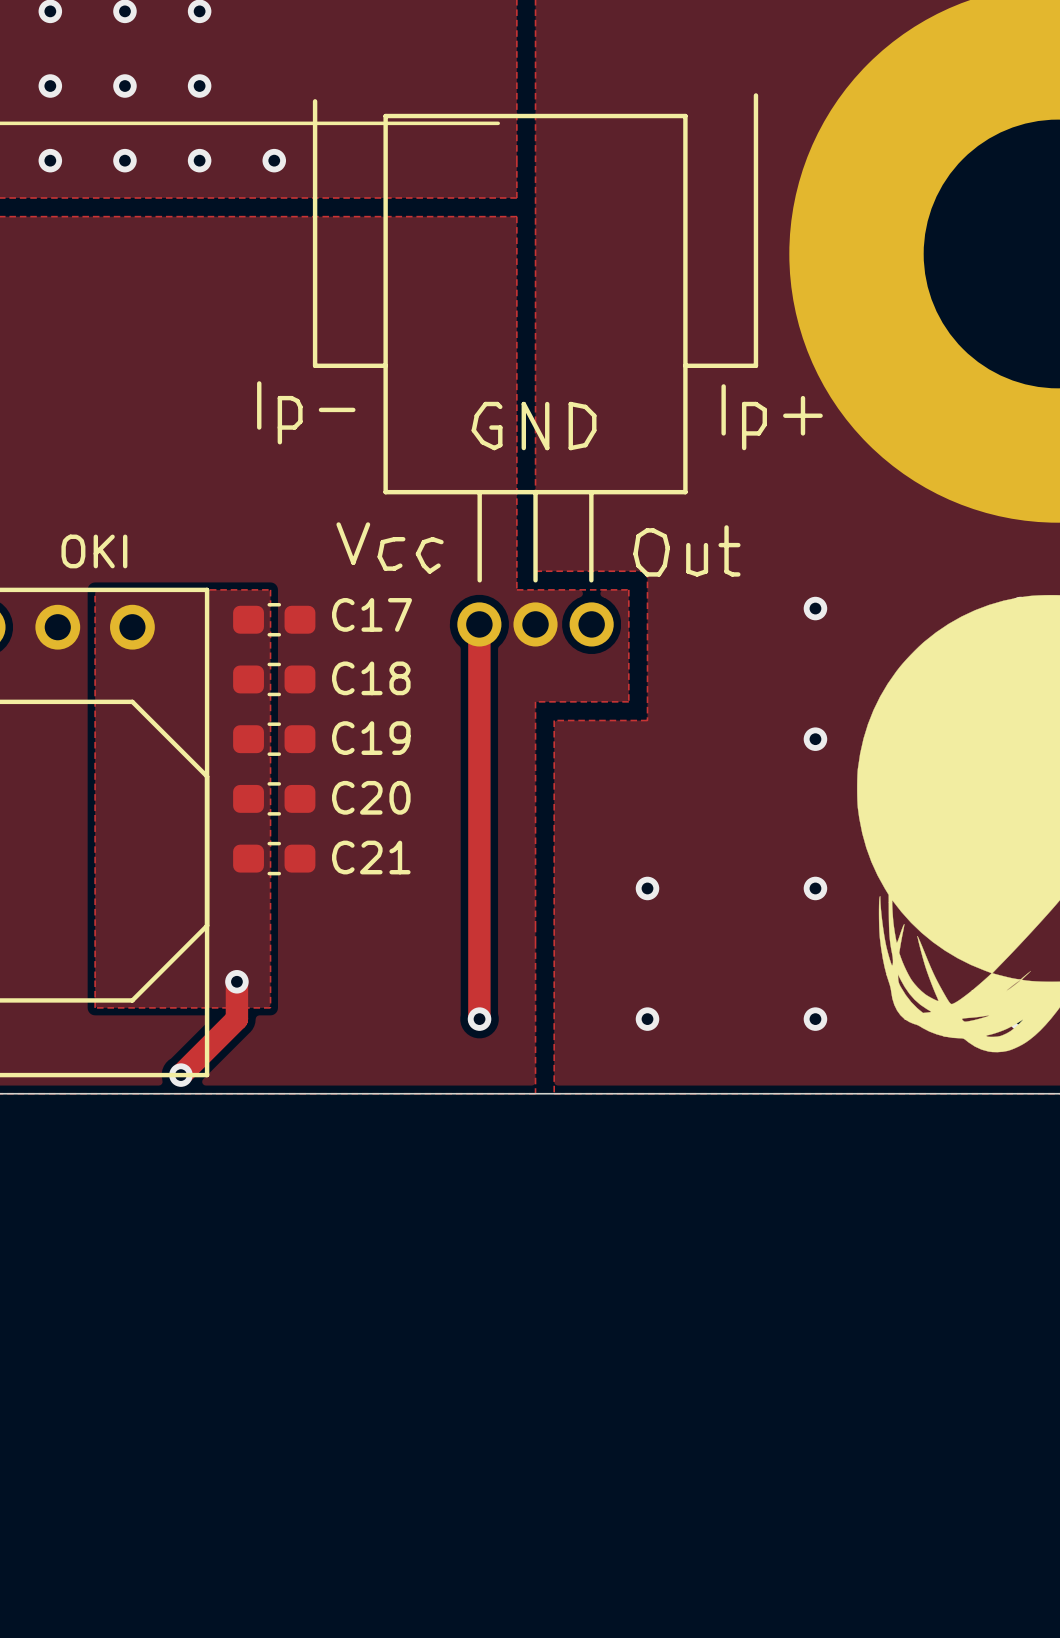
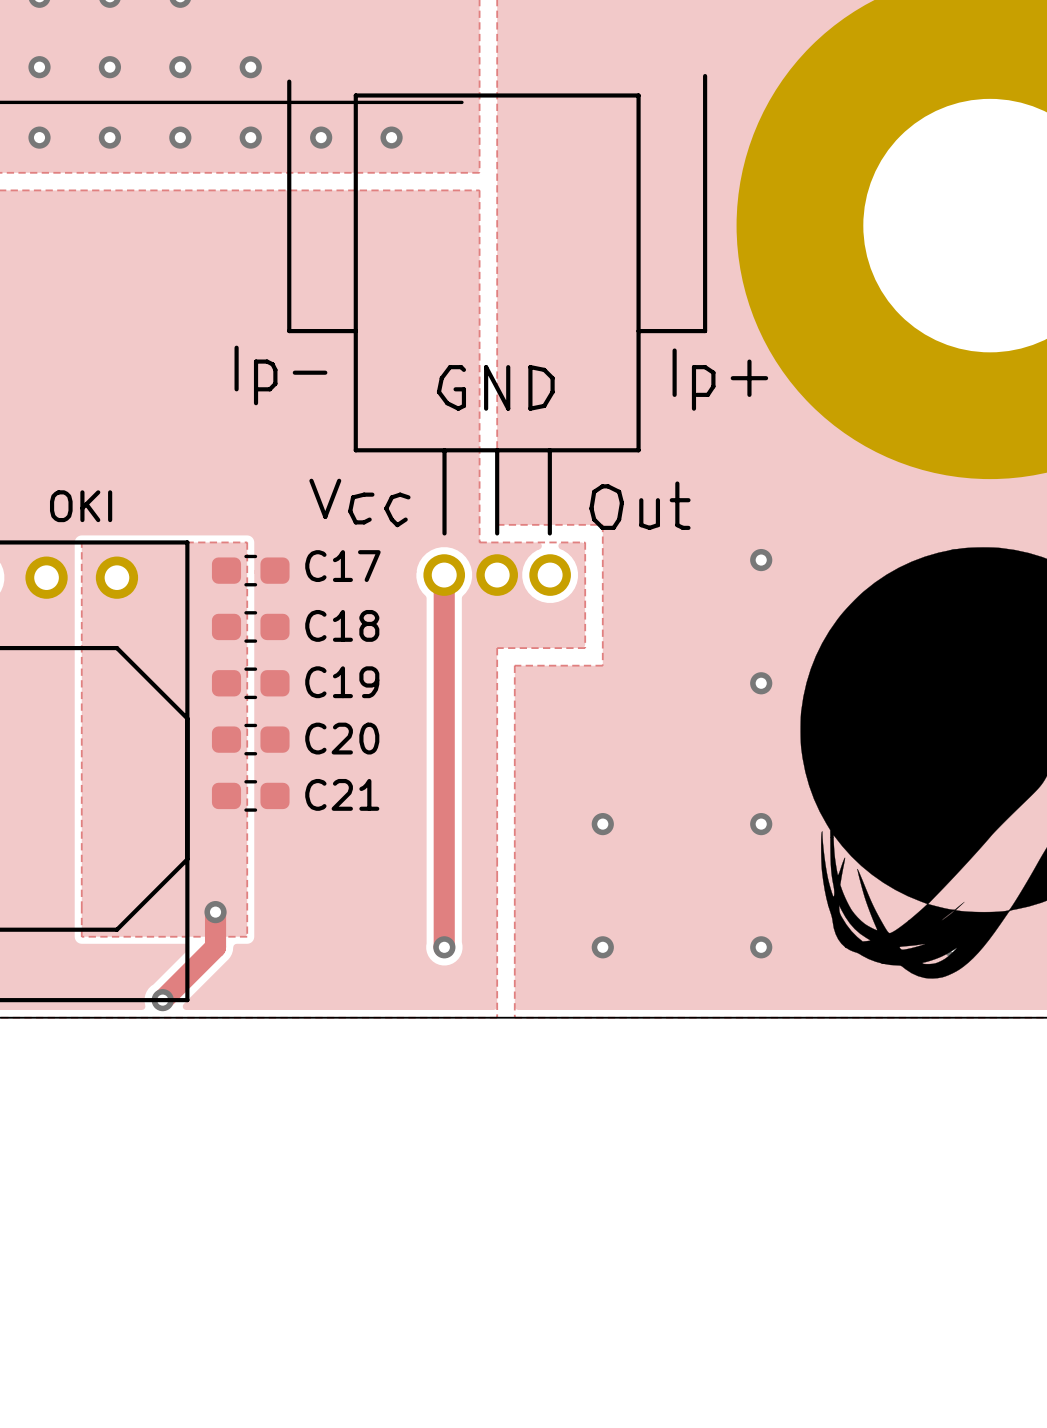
via: none -> (250, 67)
via: none -> (321, 137)
via: none -> (391, 137)

